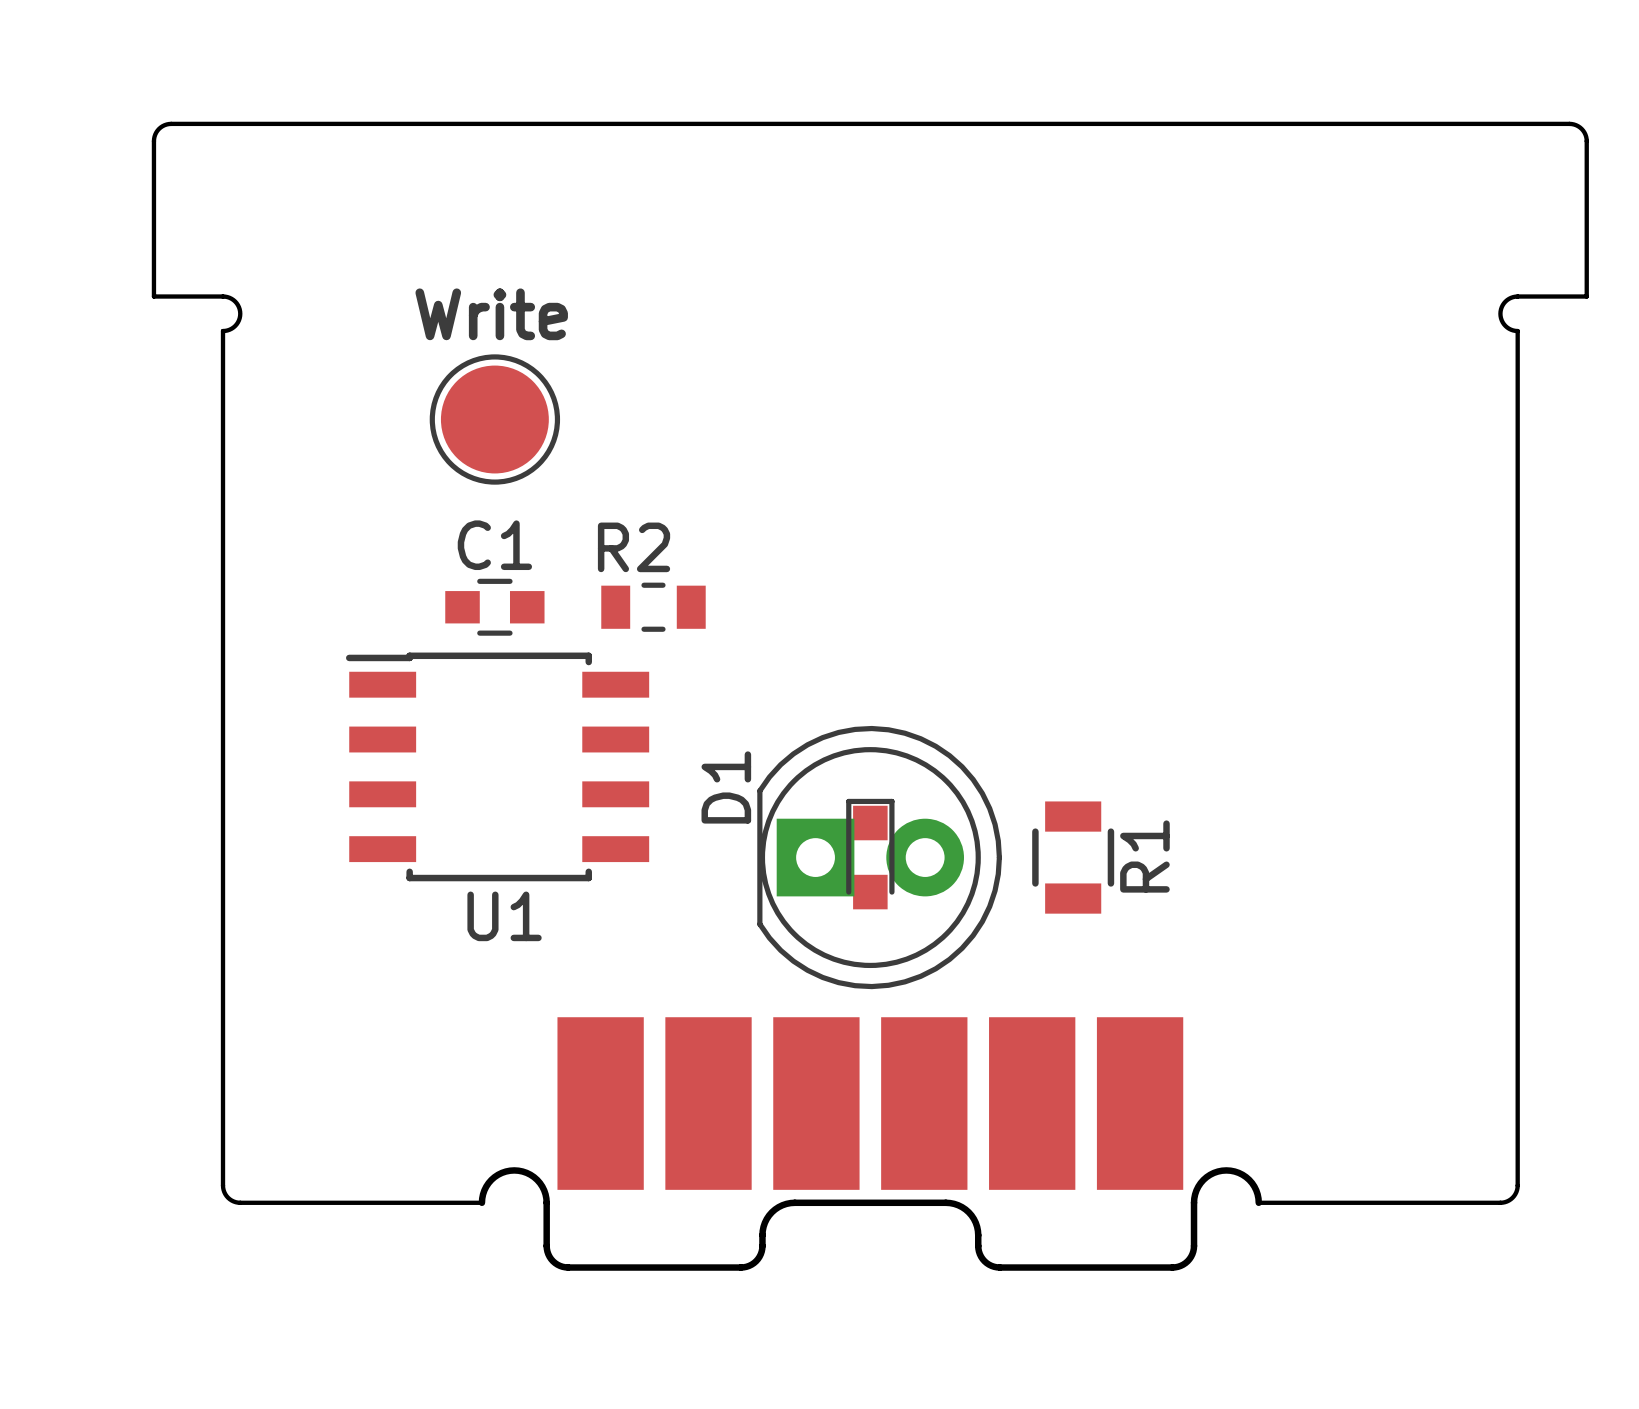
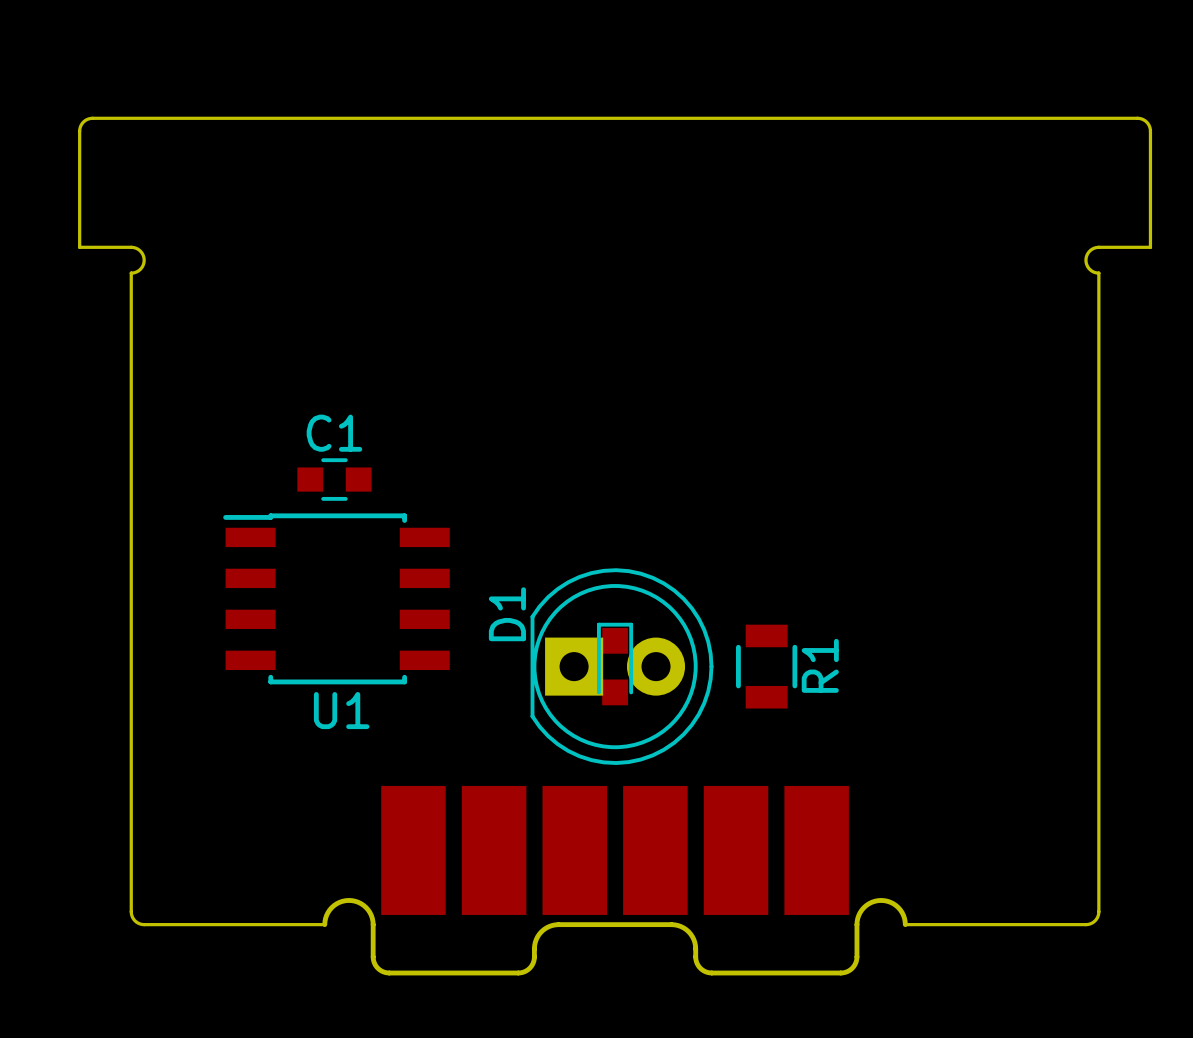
text: Write (491, 314) -> none
part: (494, 419) -> none
R2: (653, 607) -> none

